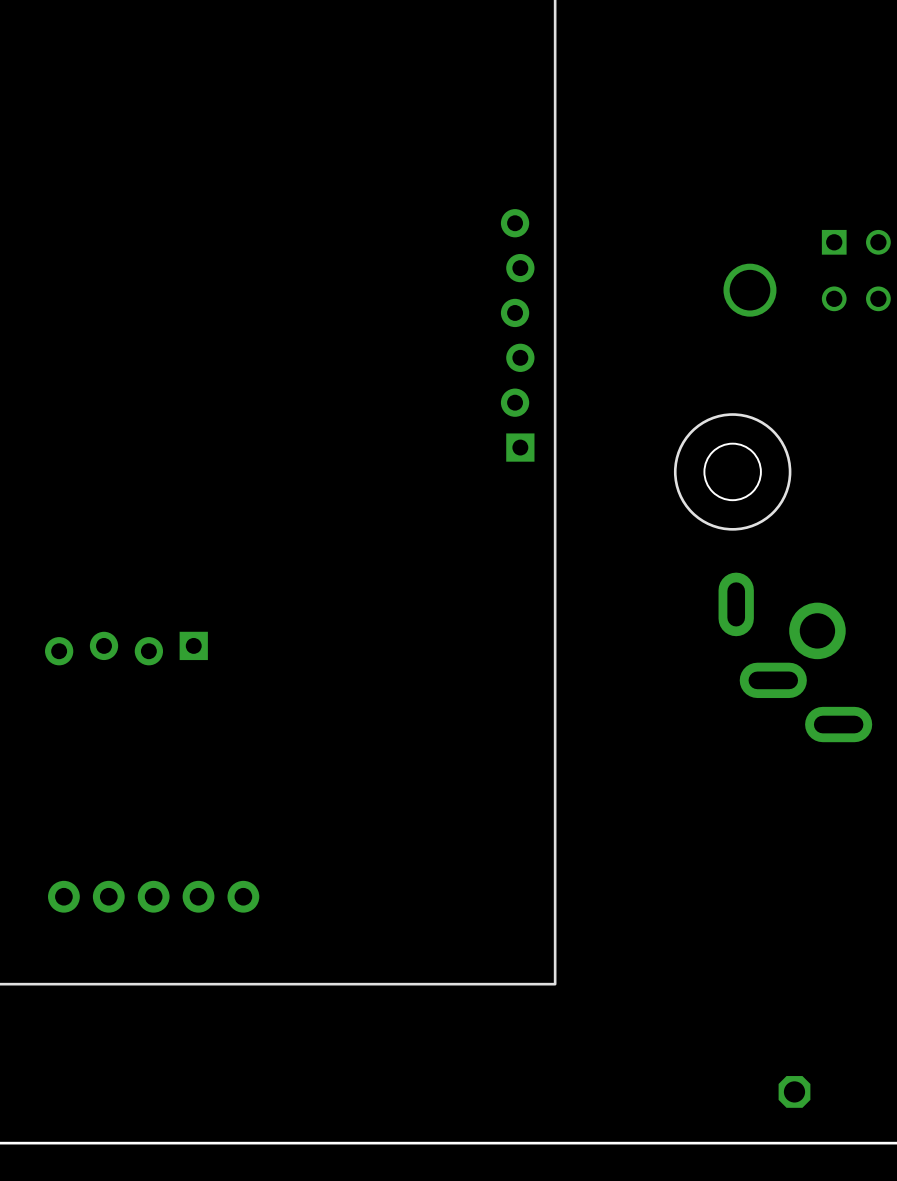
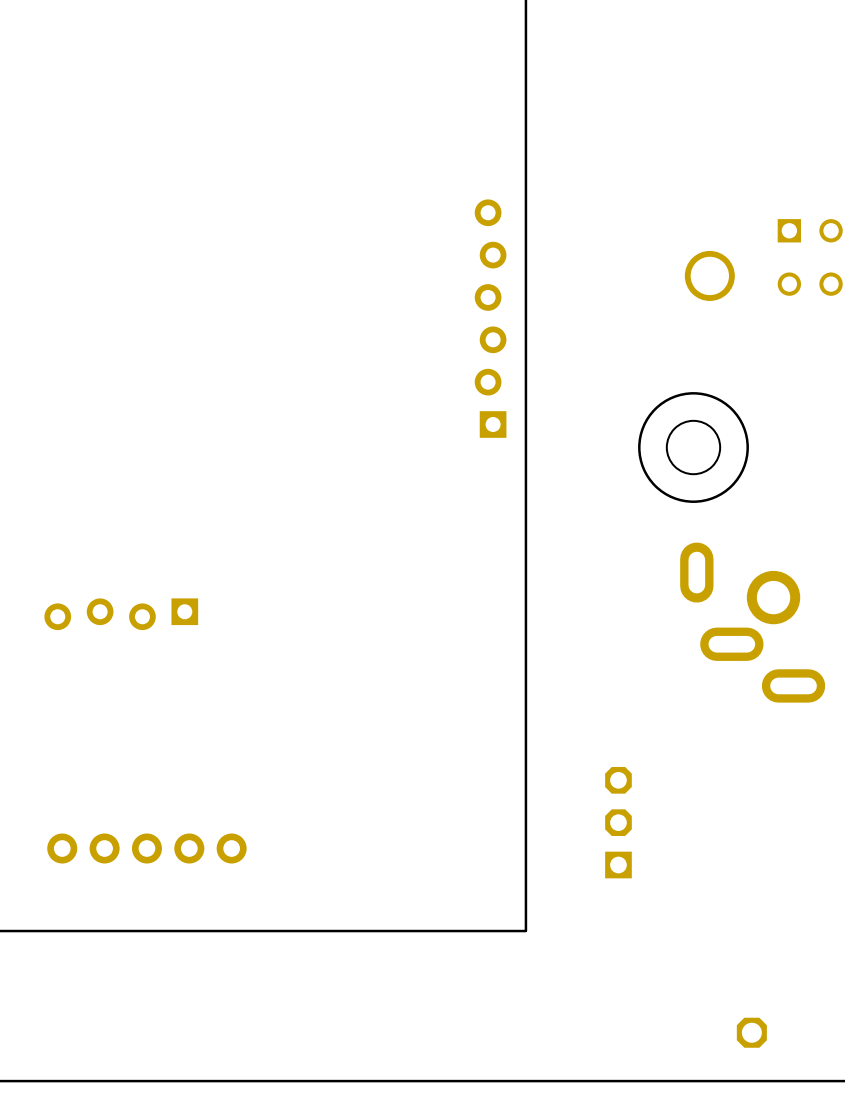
part: none -> (618, 822)

